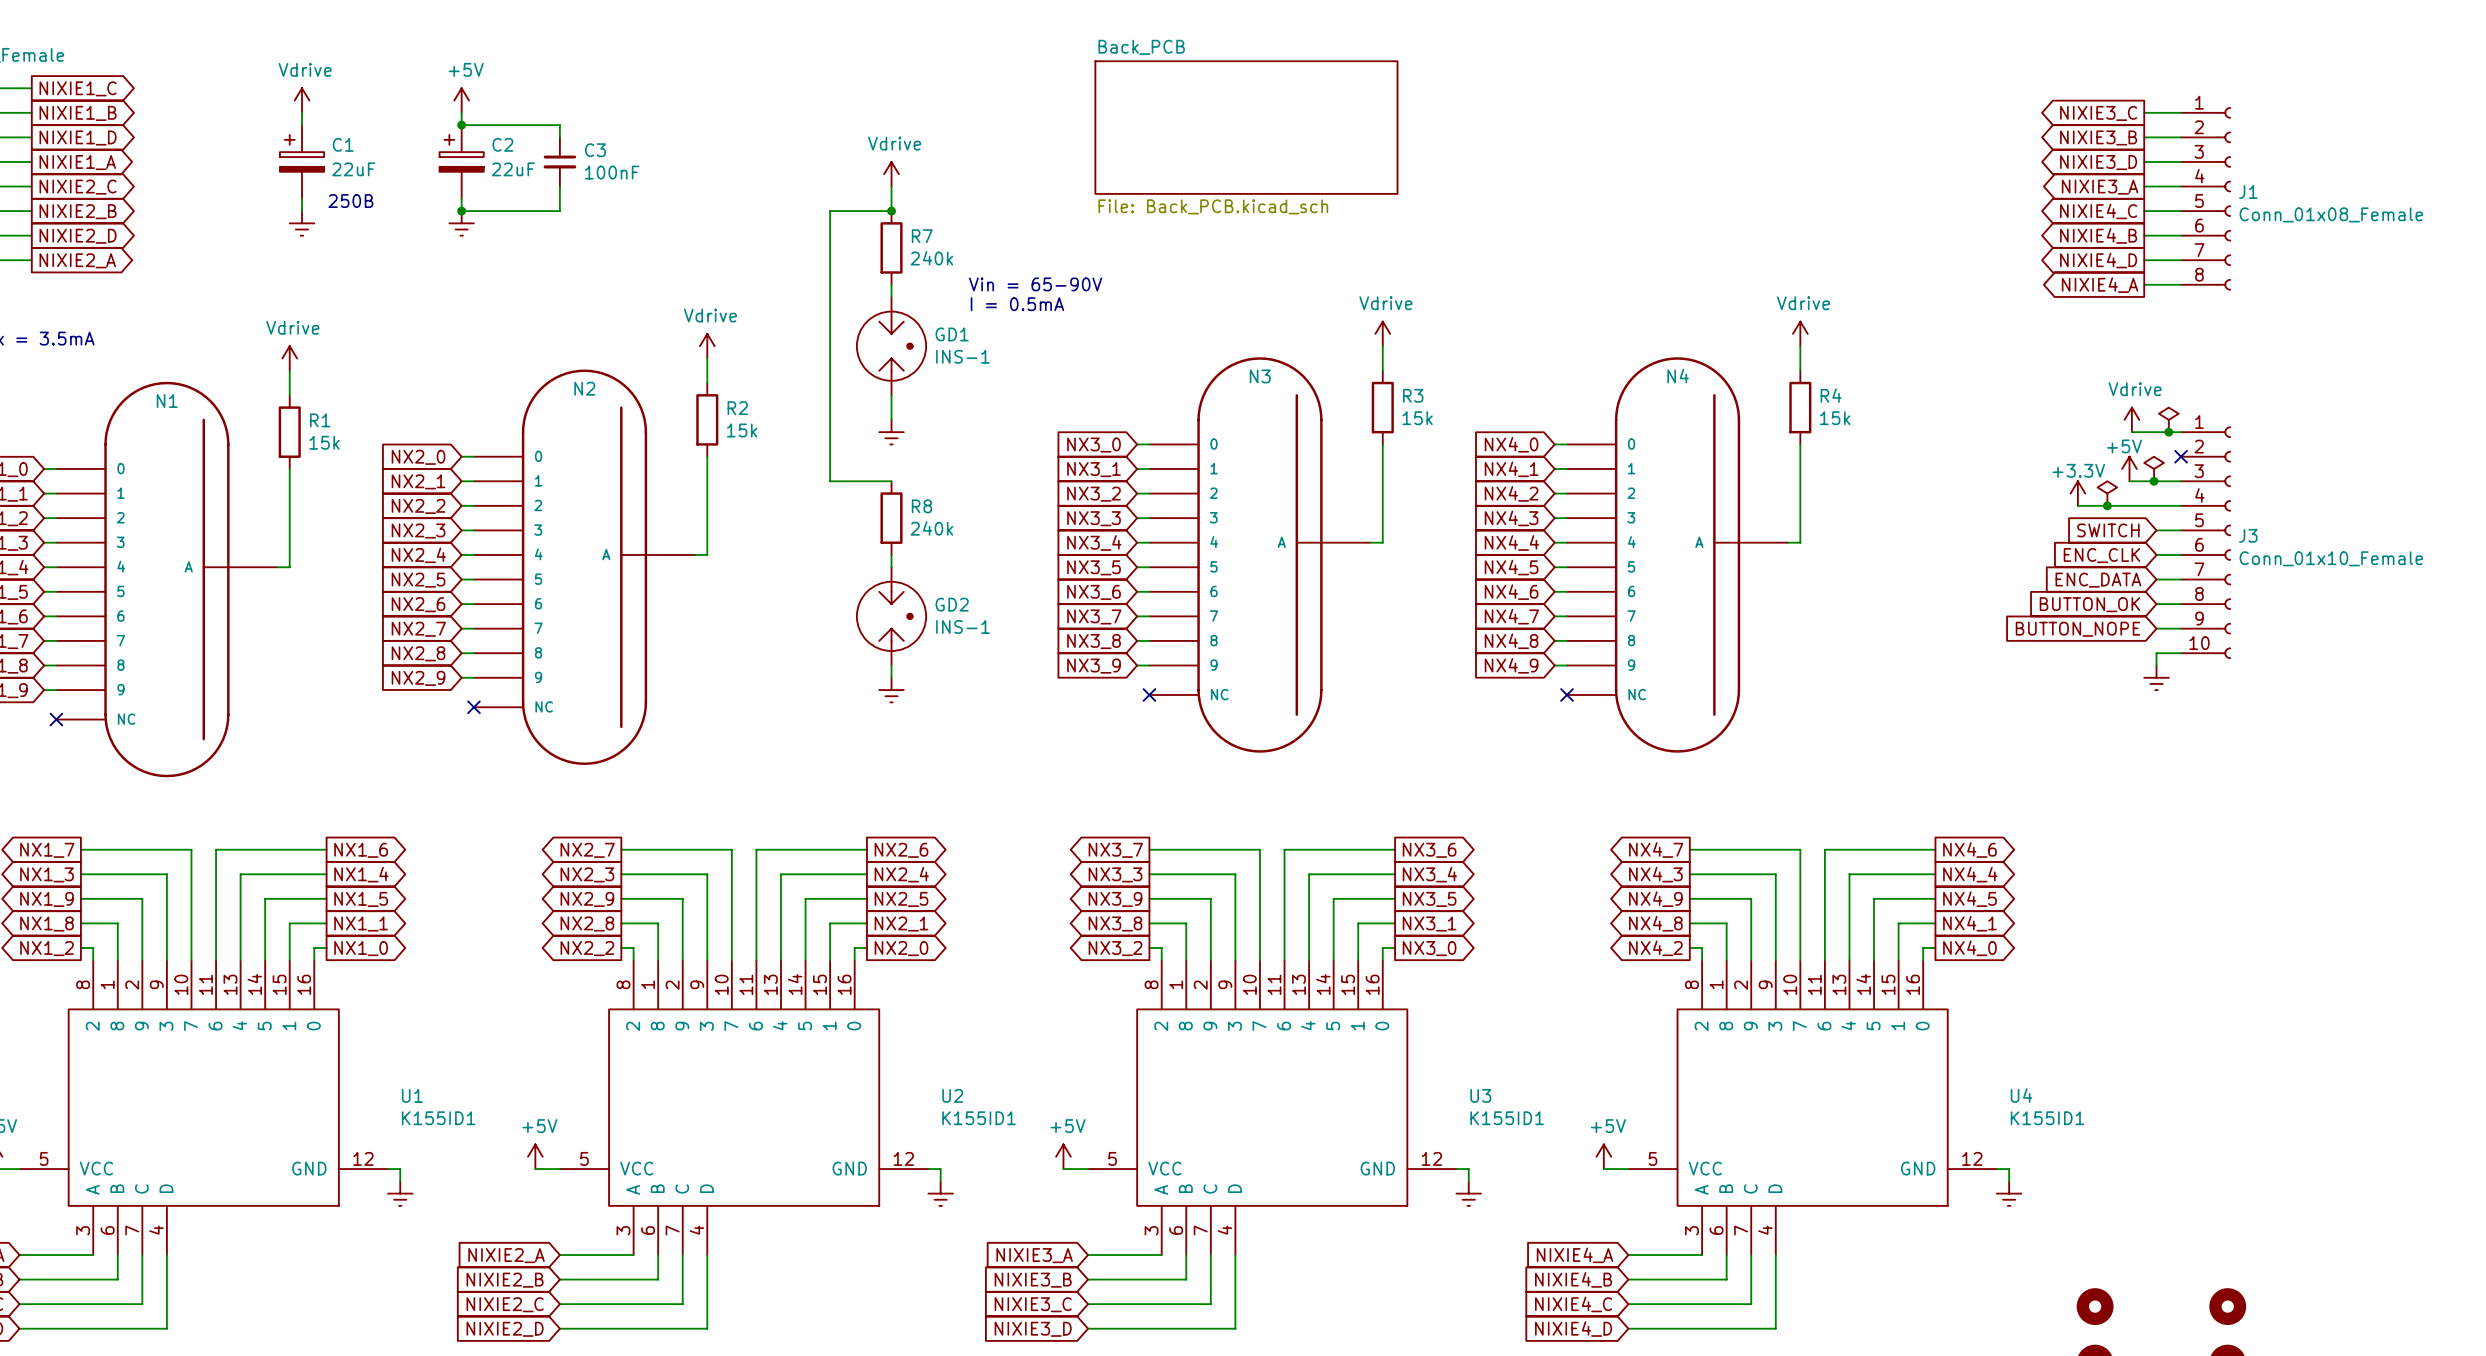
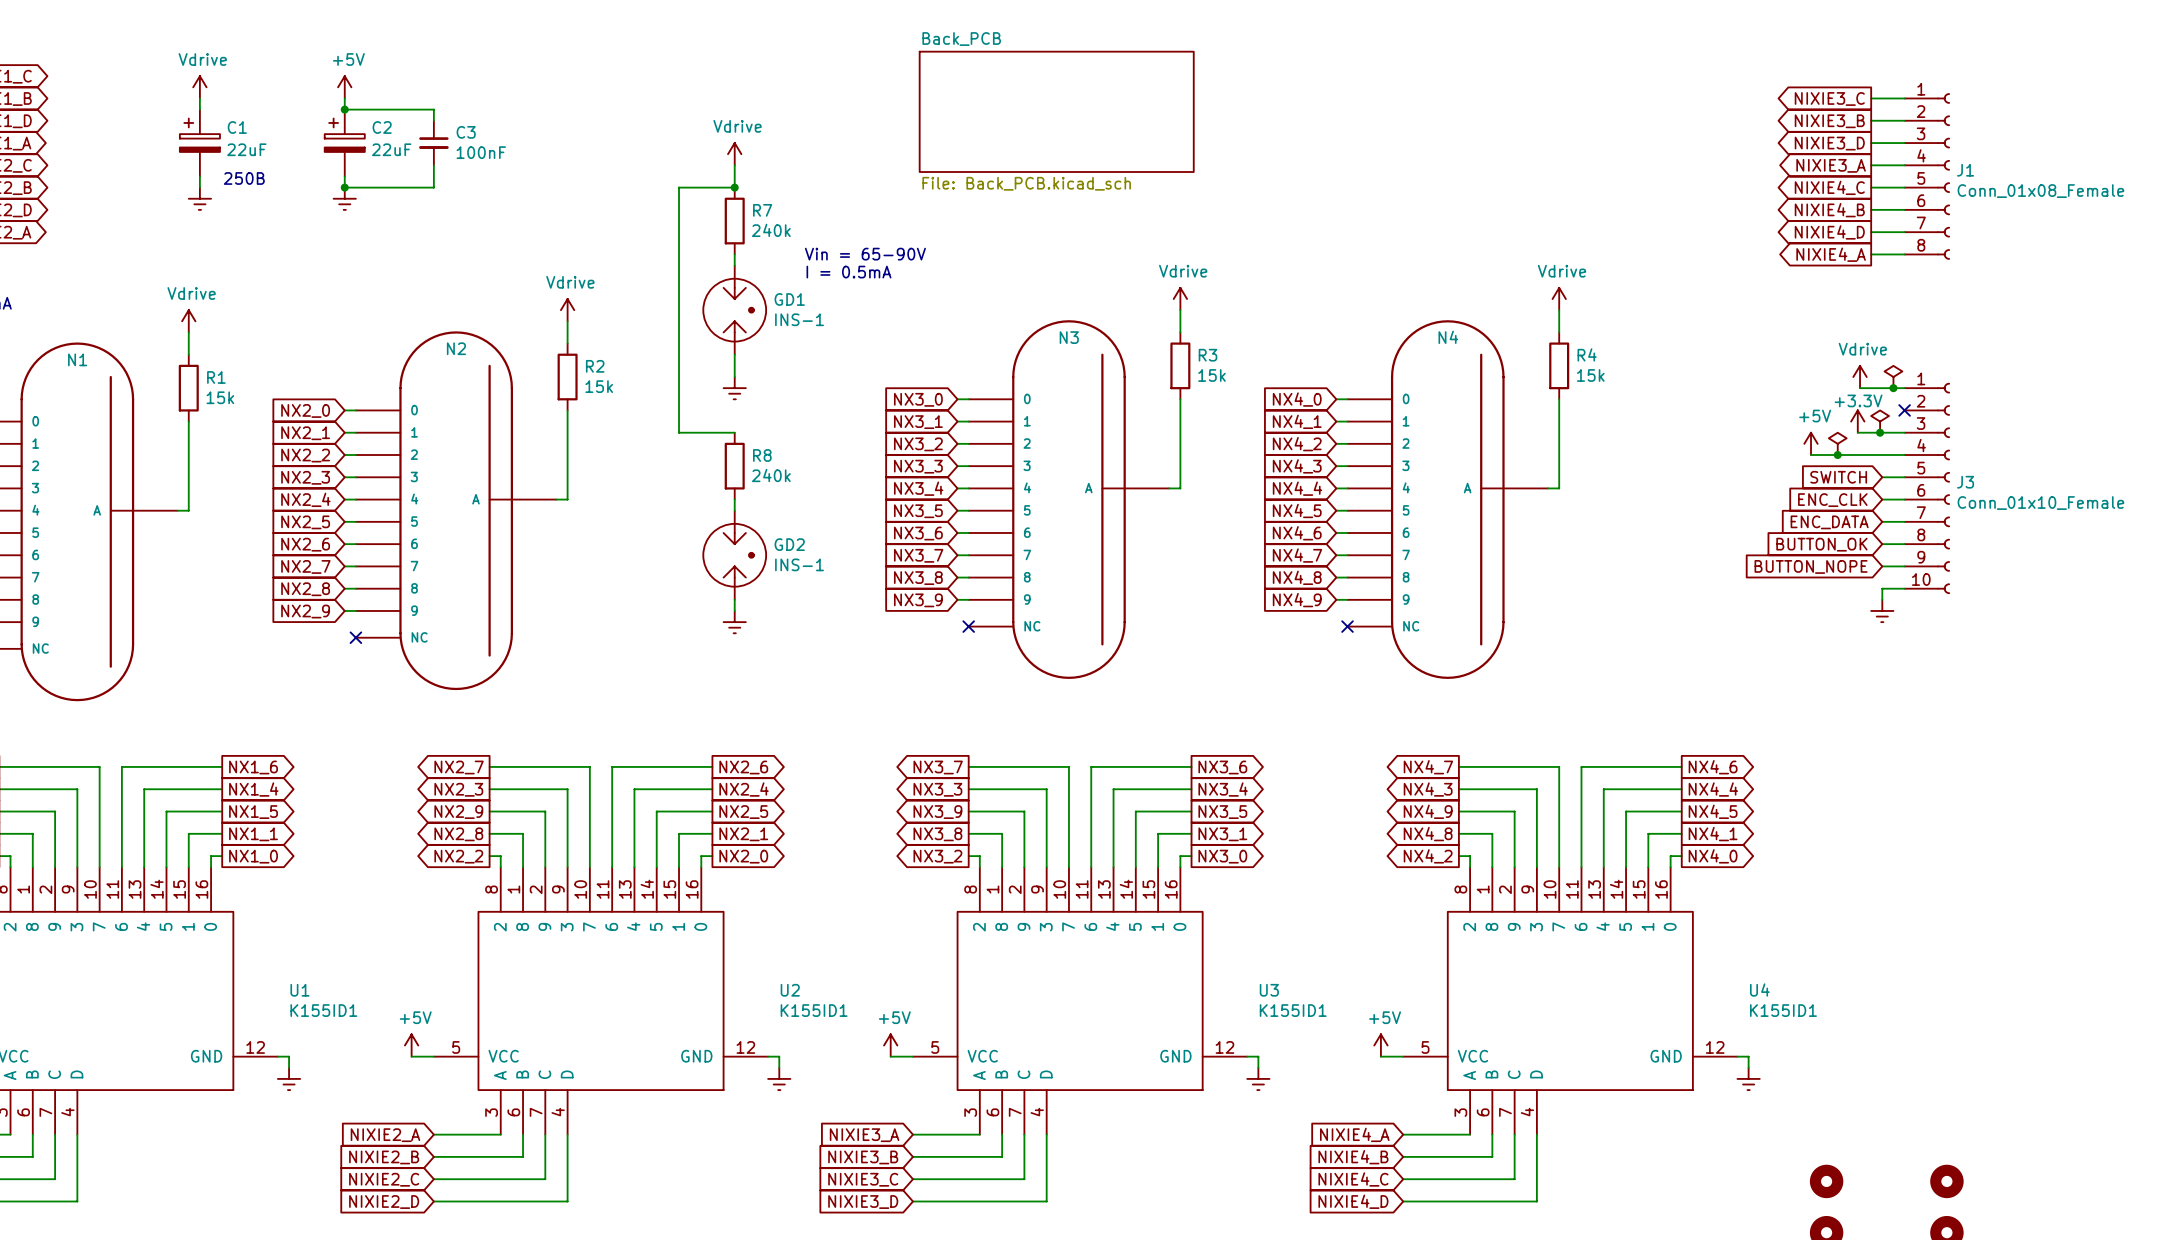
power symbol: +5V (2129, 469) -> +3.3V (1857, 421)
power symbol: +3.3V (2077, 493) -> +5V (1811, 443)

